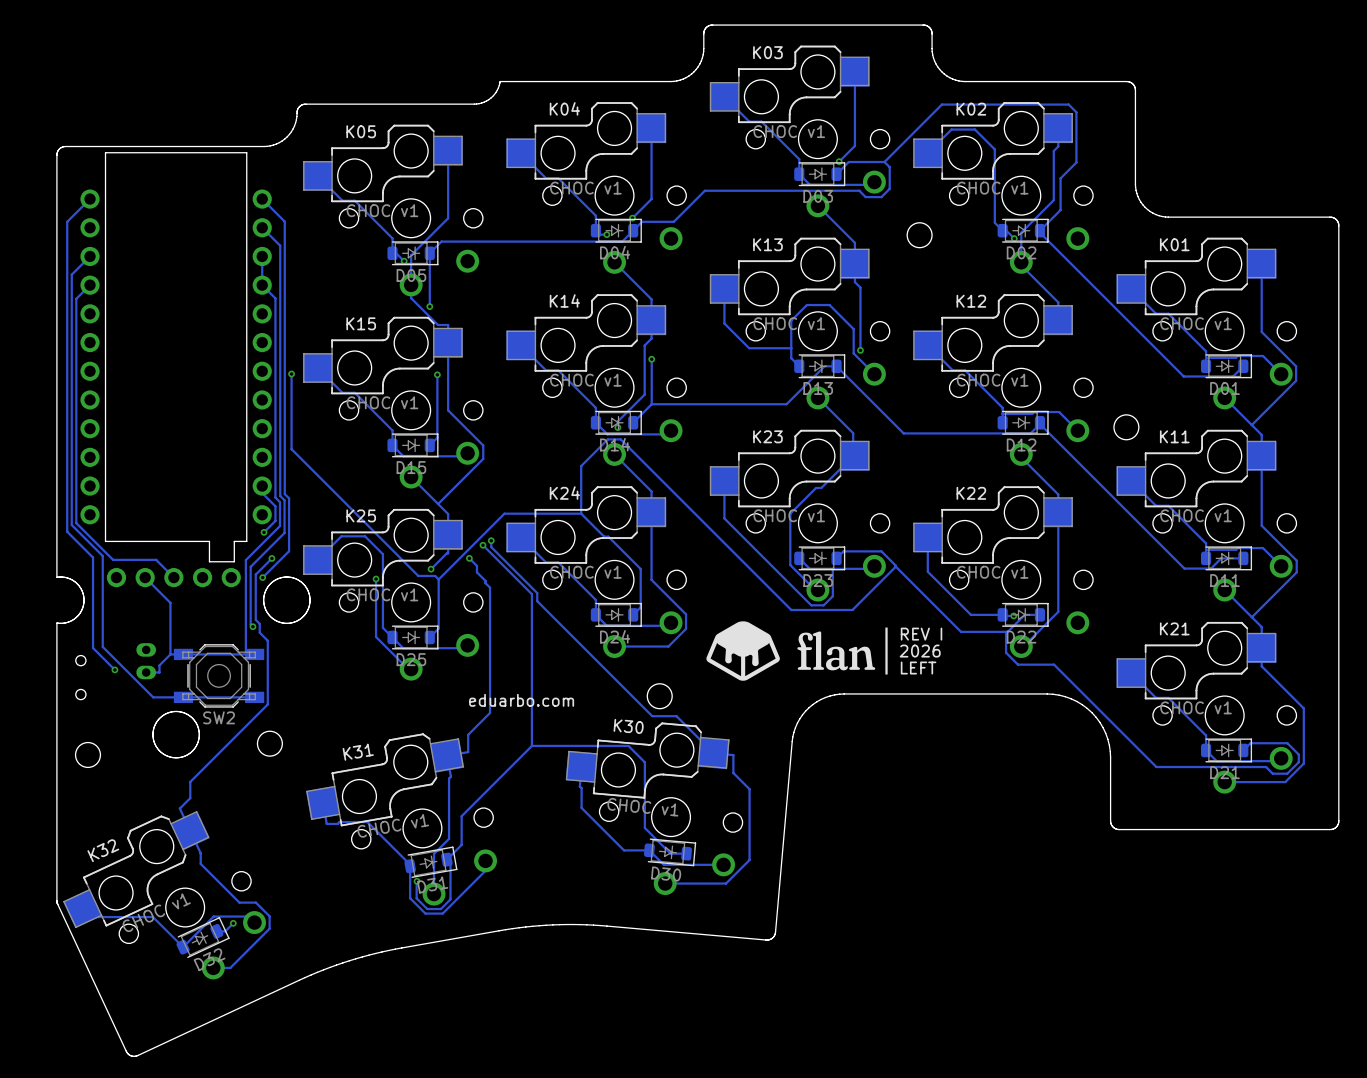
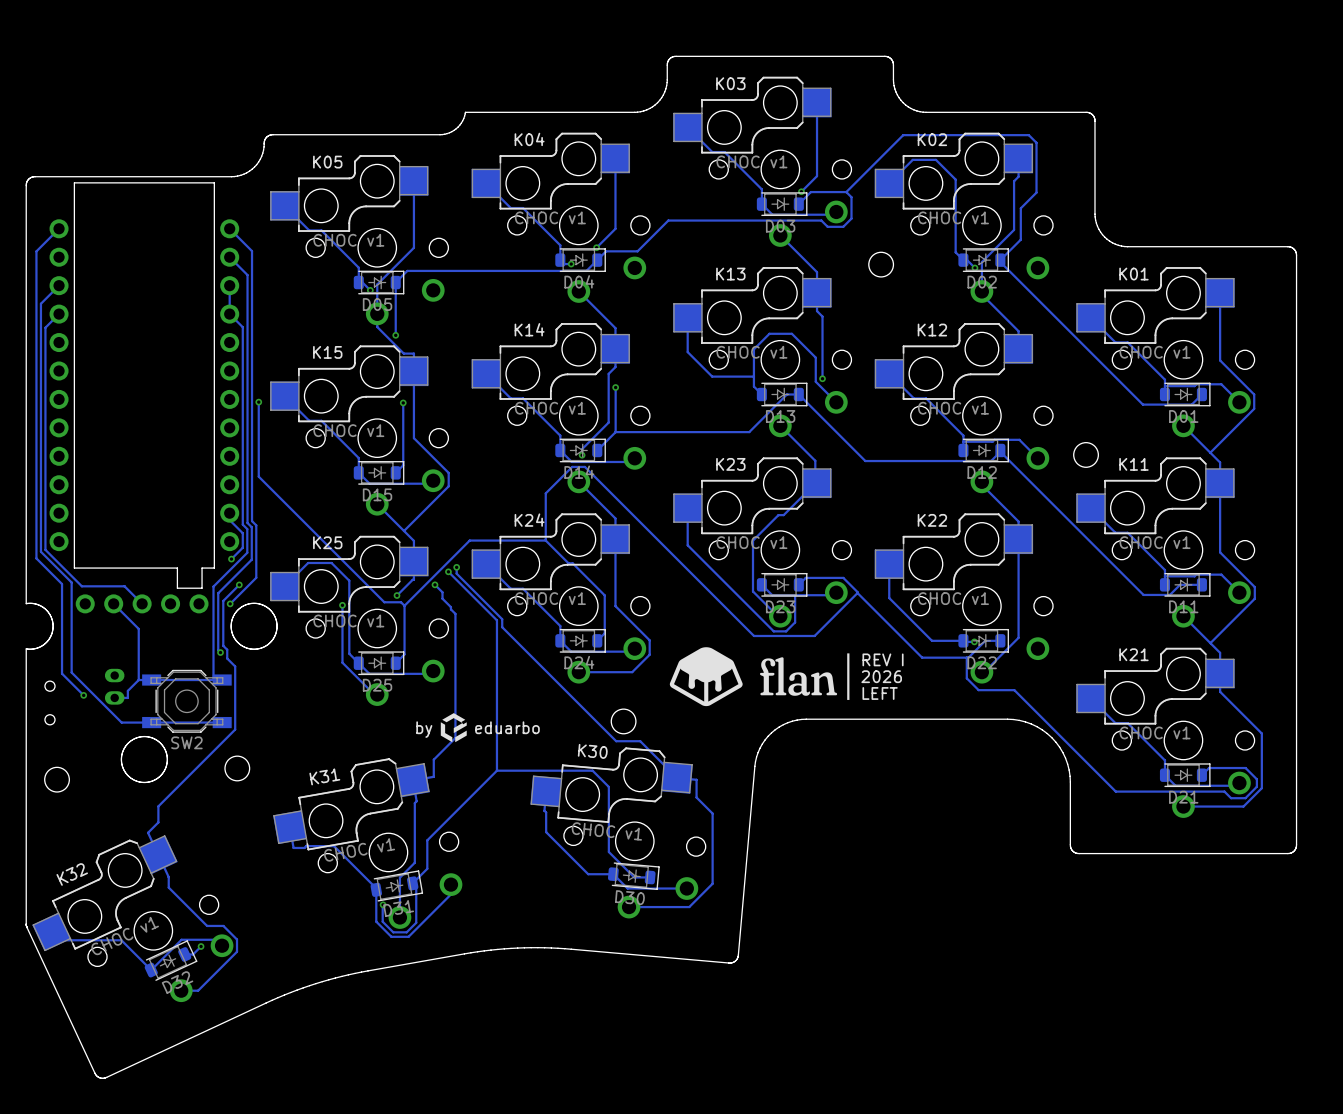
drawing: none -> [440, 713, 467, 743]
text: eduarbo.com (521, 700) -> eduarbo (507, 727)
text: none -> by (424, 729)

